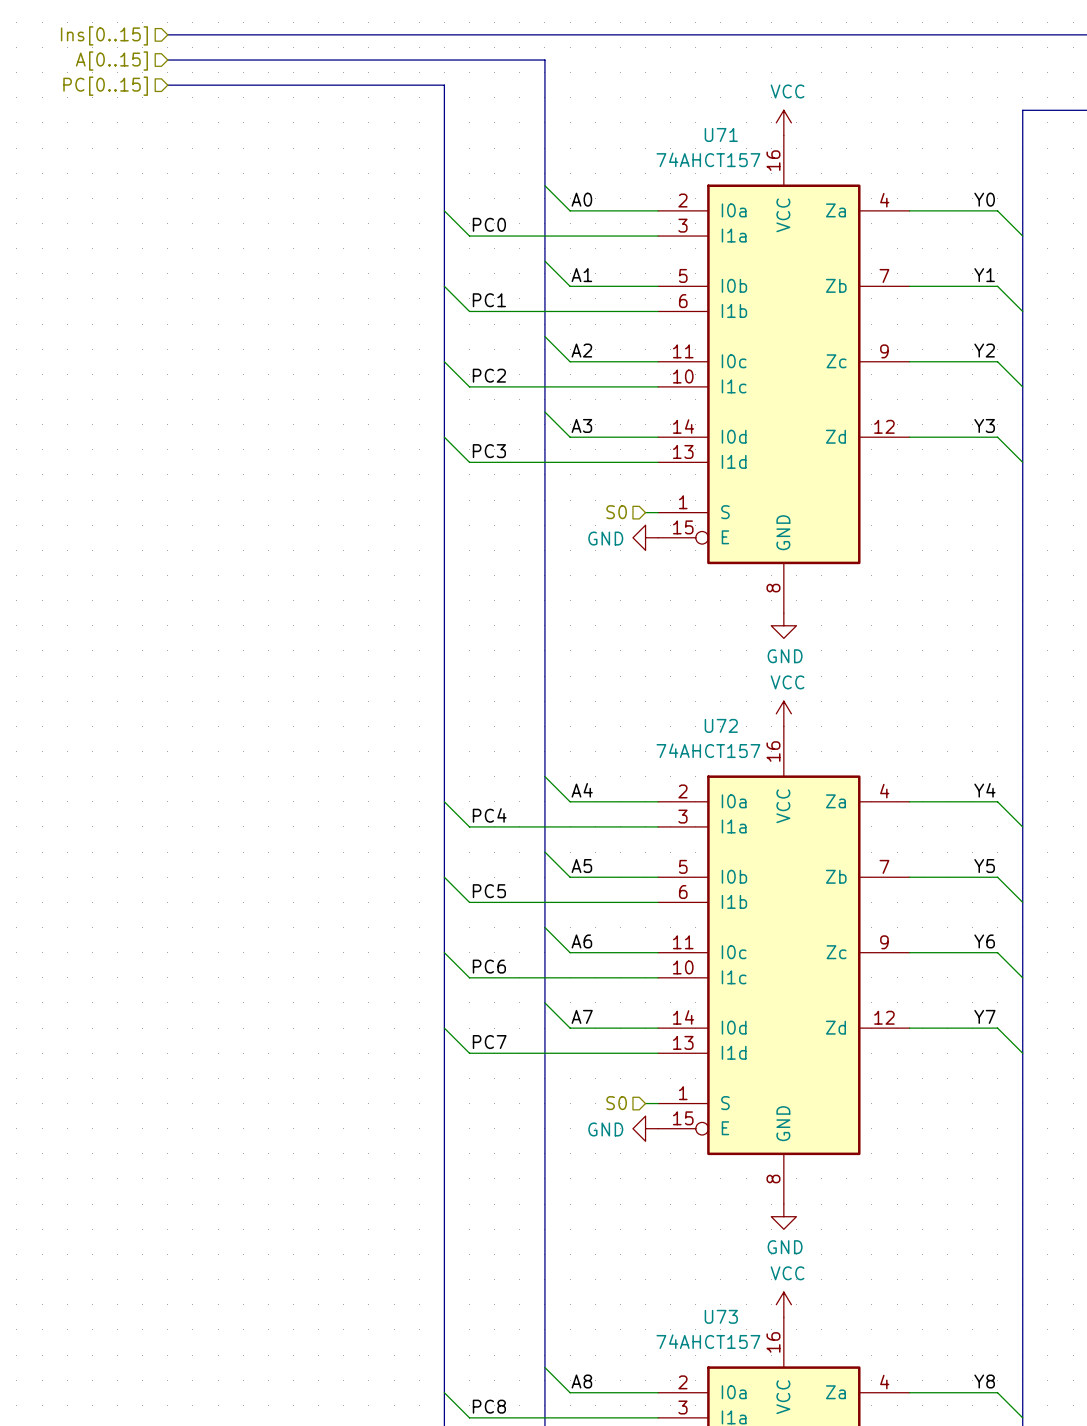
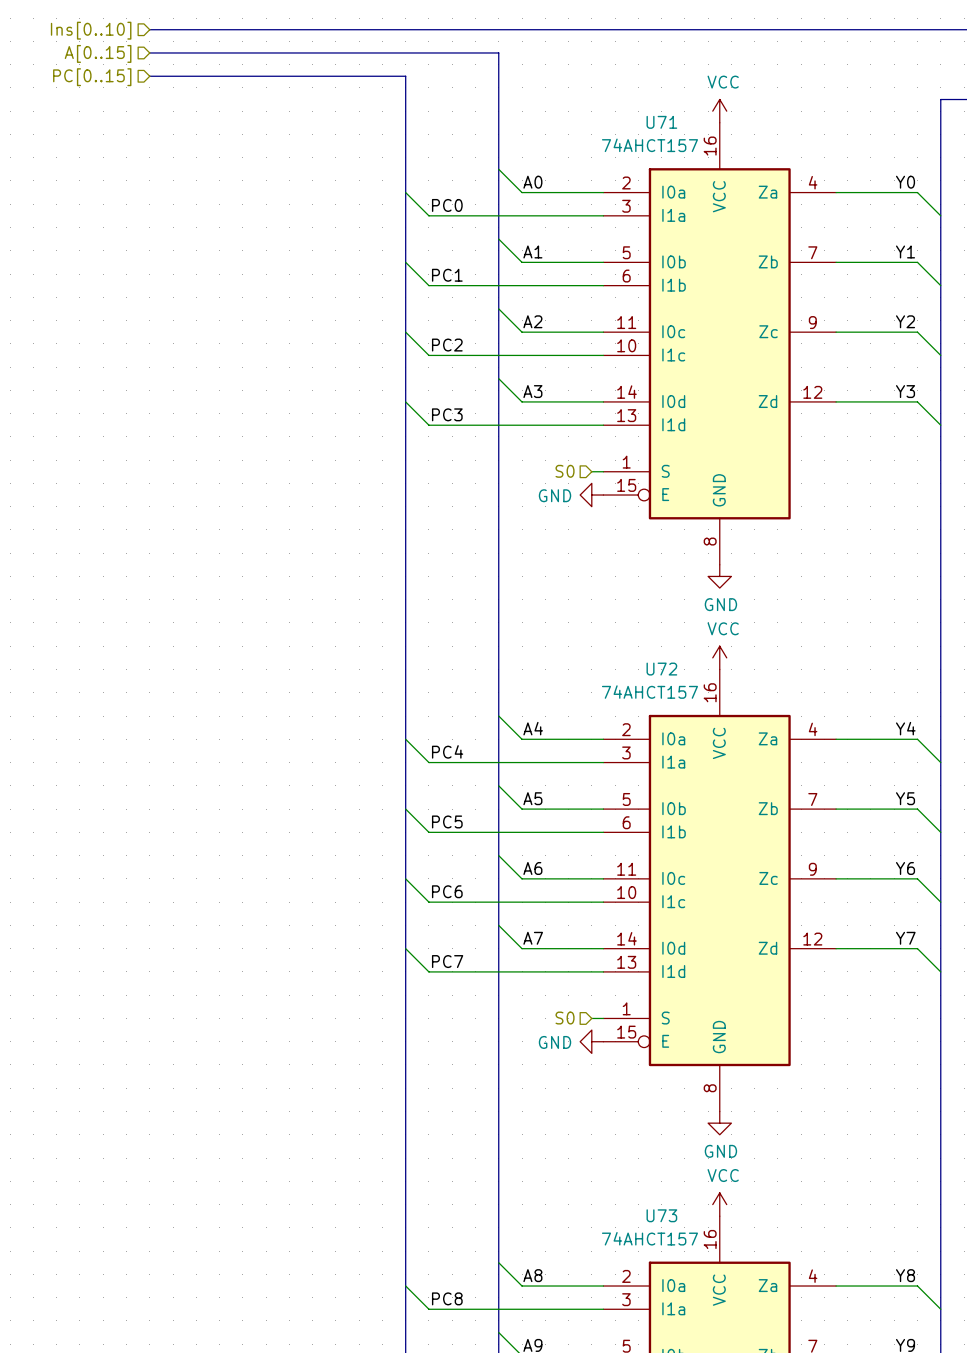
hierarchical label: Ins[0..15] (104, 35) -> Ins[0..10] (91, 30)

